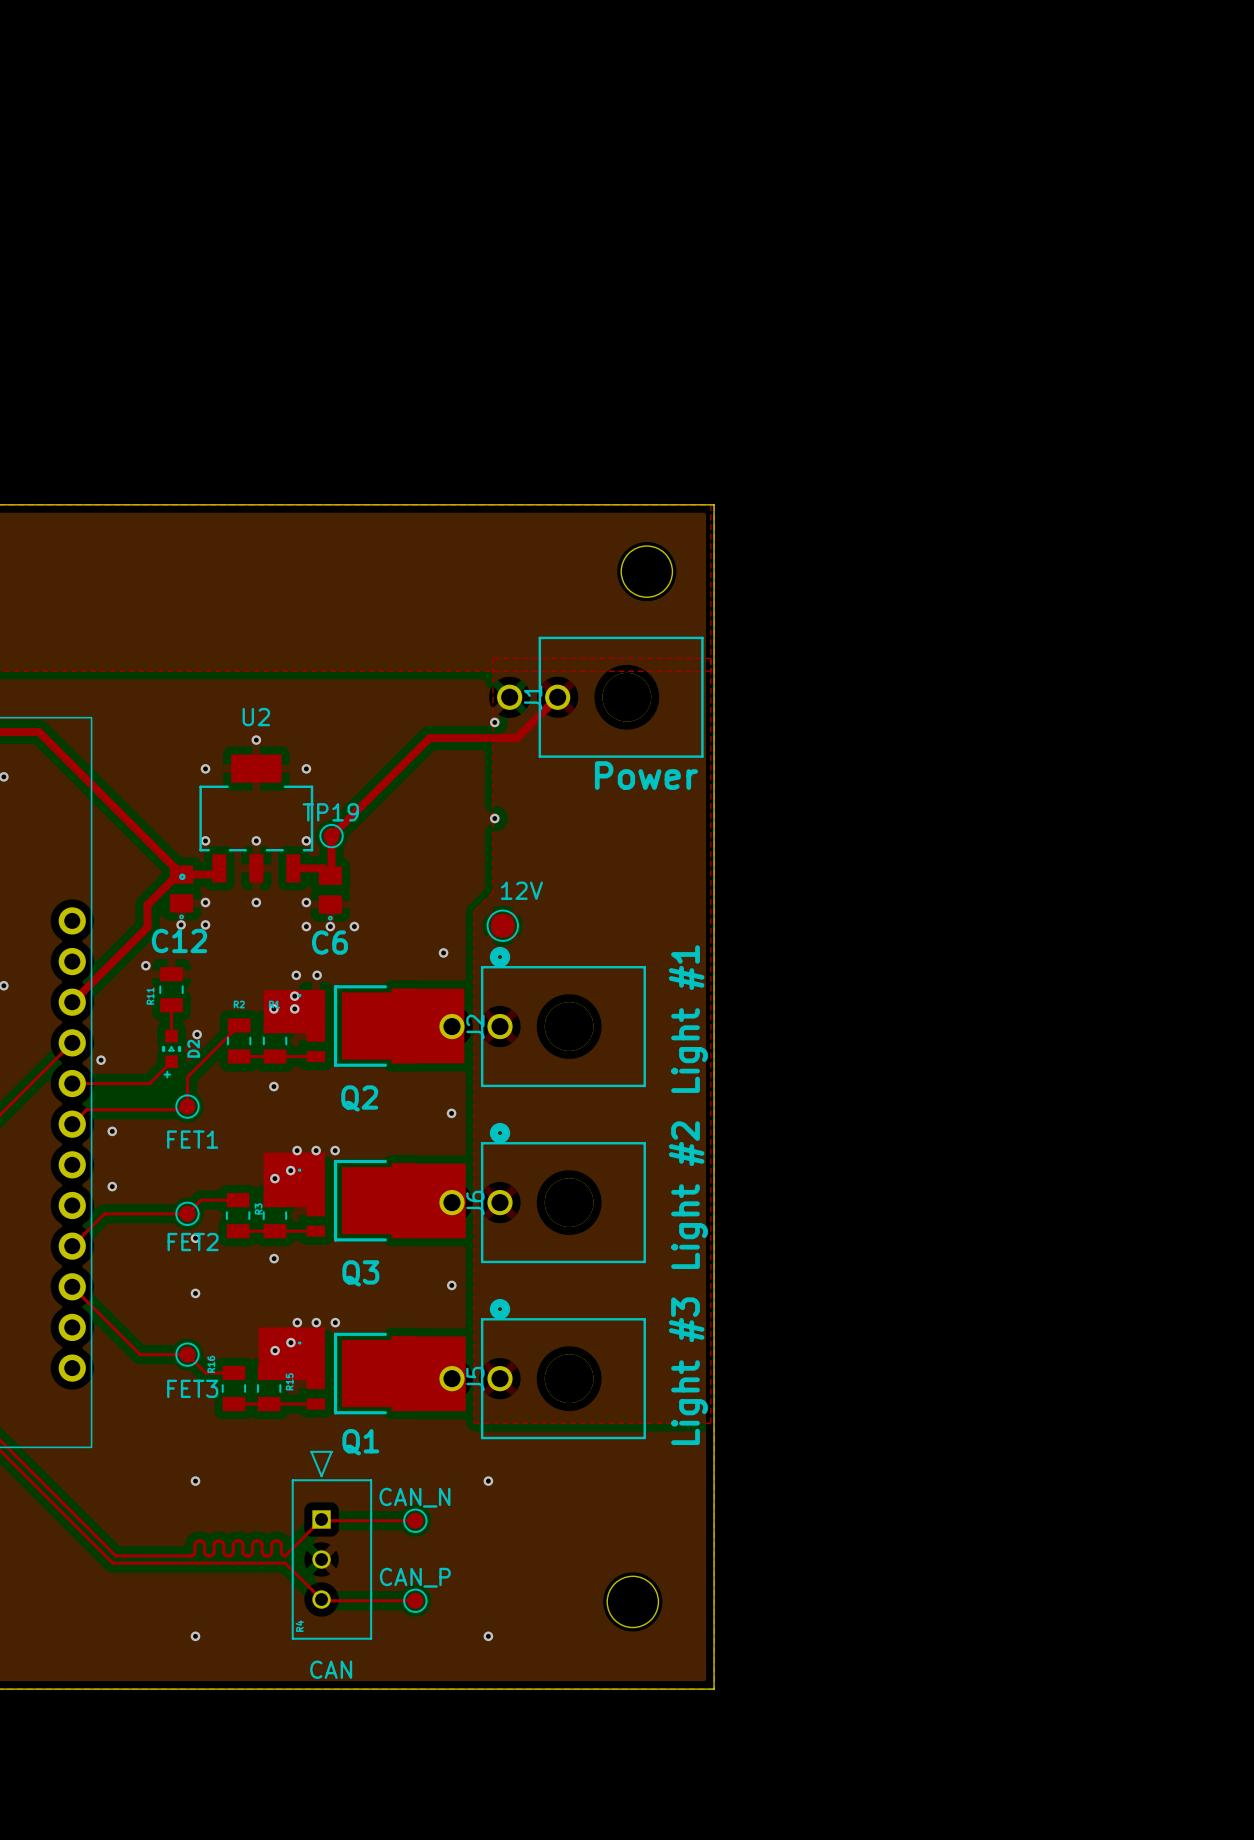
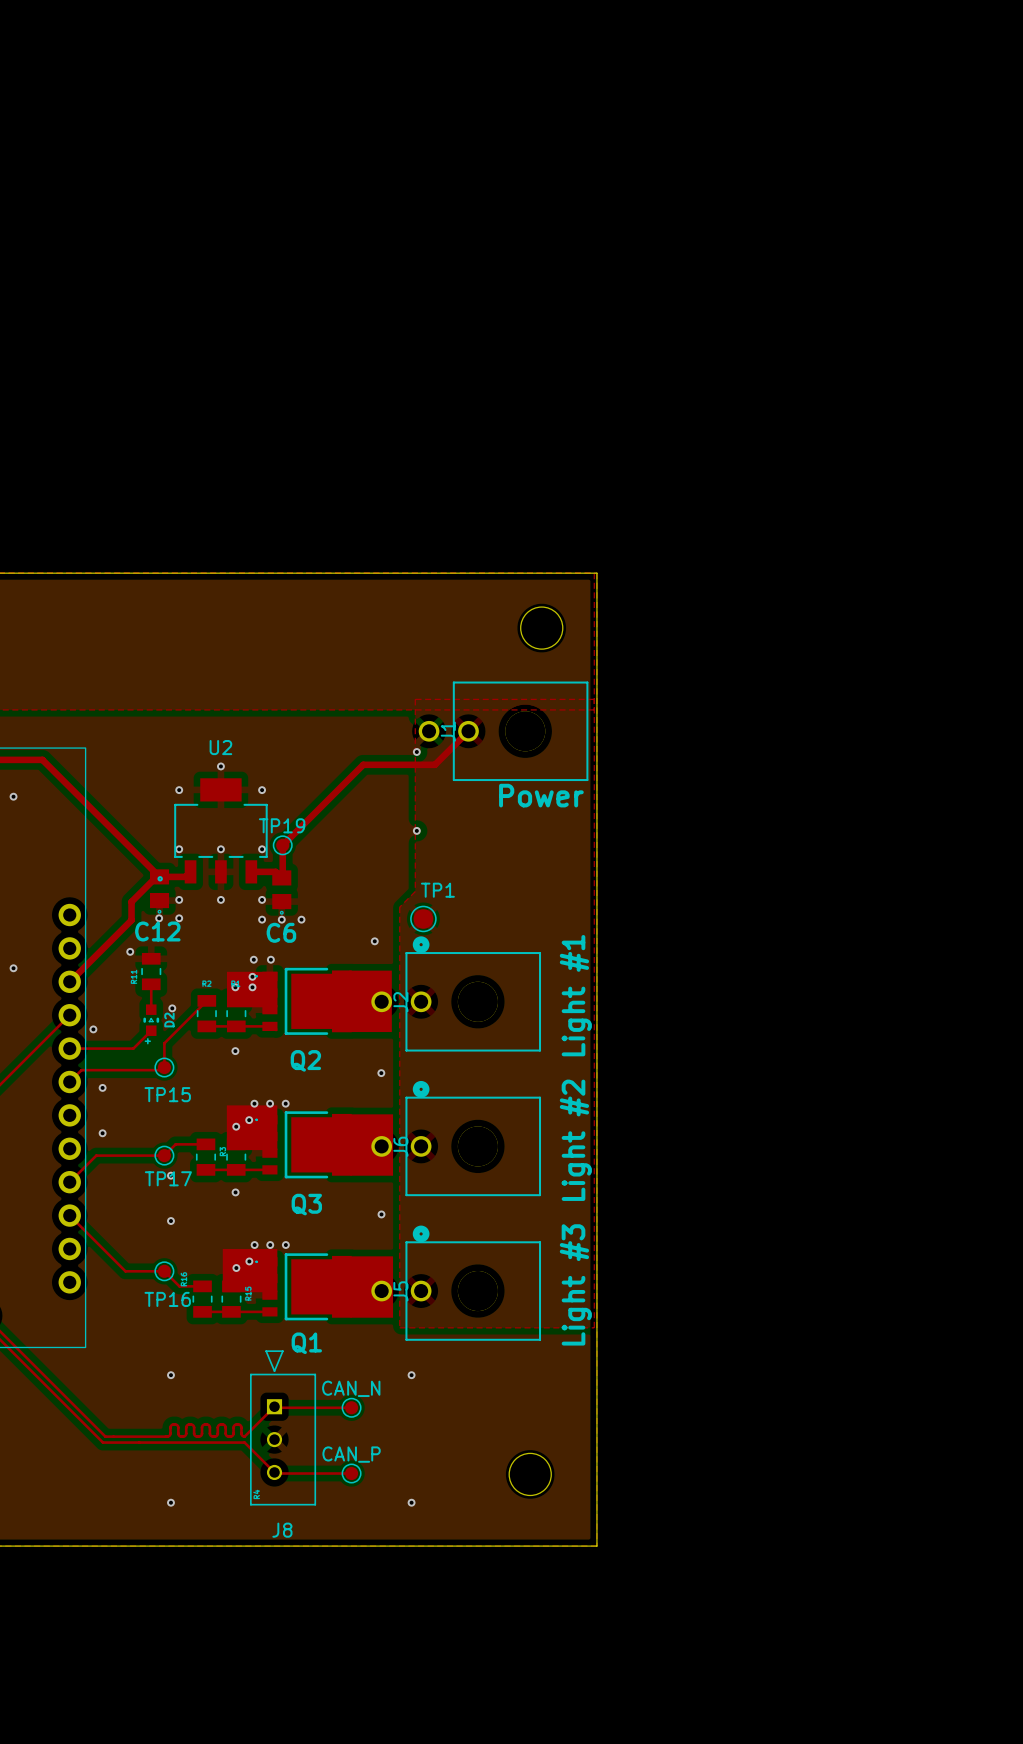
12V name: 12V (521, 890) -> TP1 (437, 890)
FET1 name: FET1 (192, 1139) -> TP15 (167, 1094)
FET2 name: FET2 (193, 1242) -> TP17 (168, 1178)
FET3 name: FET3 (192, 1388) -> TP16 (167, 1299)
CAN name: CAN (331, 1669) -> J8 (282, 1530)

